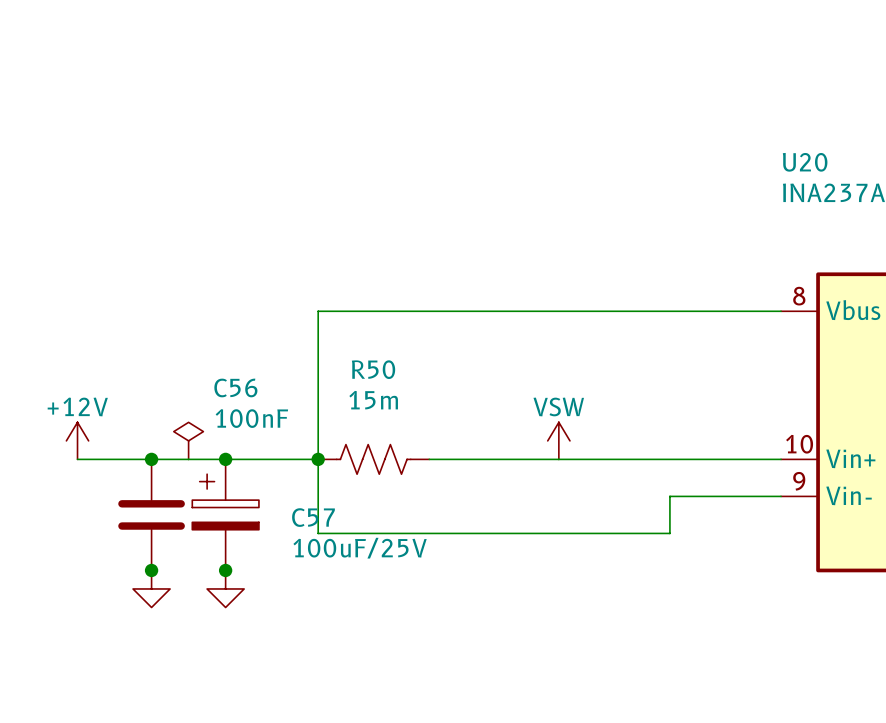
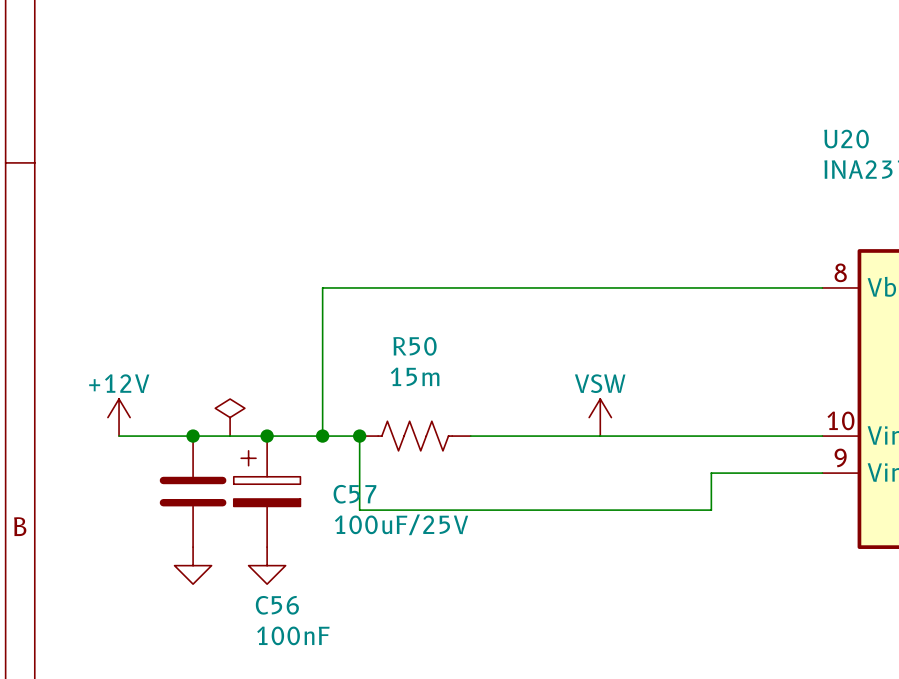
wire: (318, 311) (318, 459) -> (359, 287) (322, 287) (322, 436)
C56 name position: C56 (235, 387) -> C56 (277, 605)
C56 value position: 100nF (251, 418) -> 100nF (293, 635)
junction: none -> (322, 436)
junction: (151, 570) -> none
junction: (225, 570) -> none

